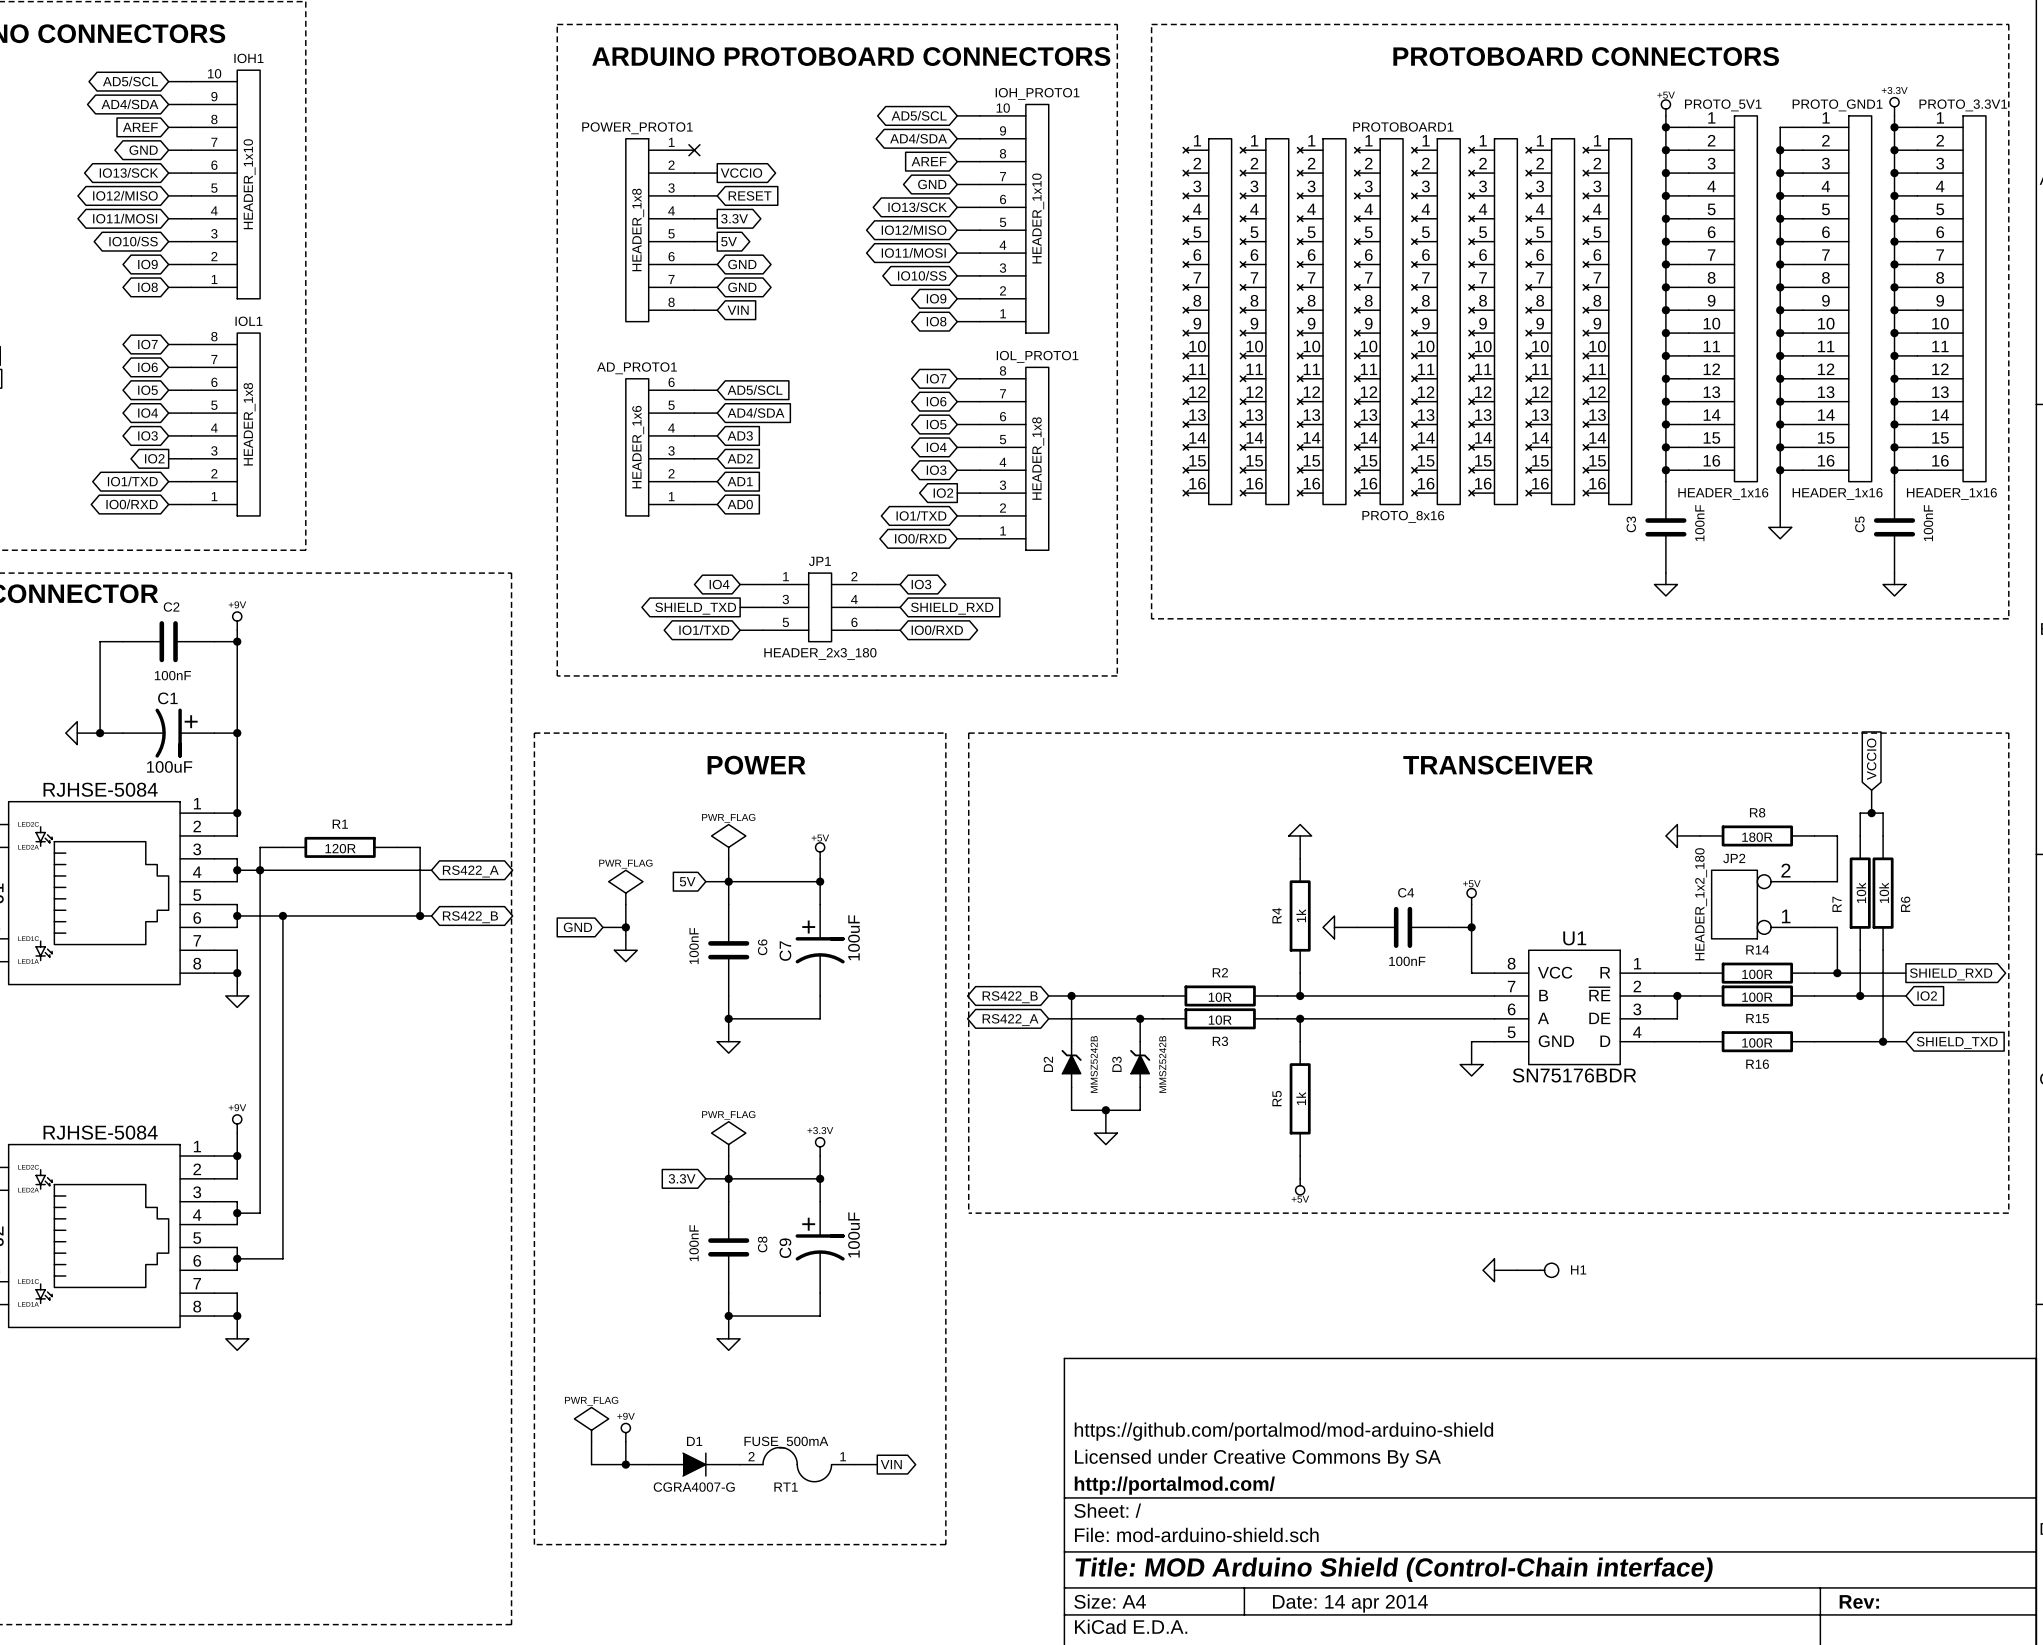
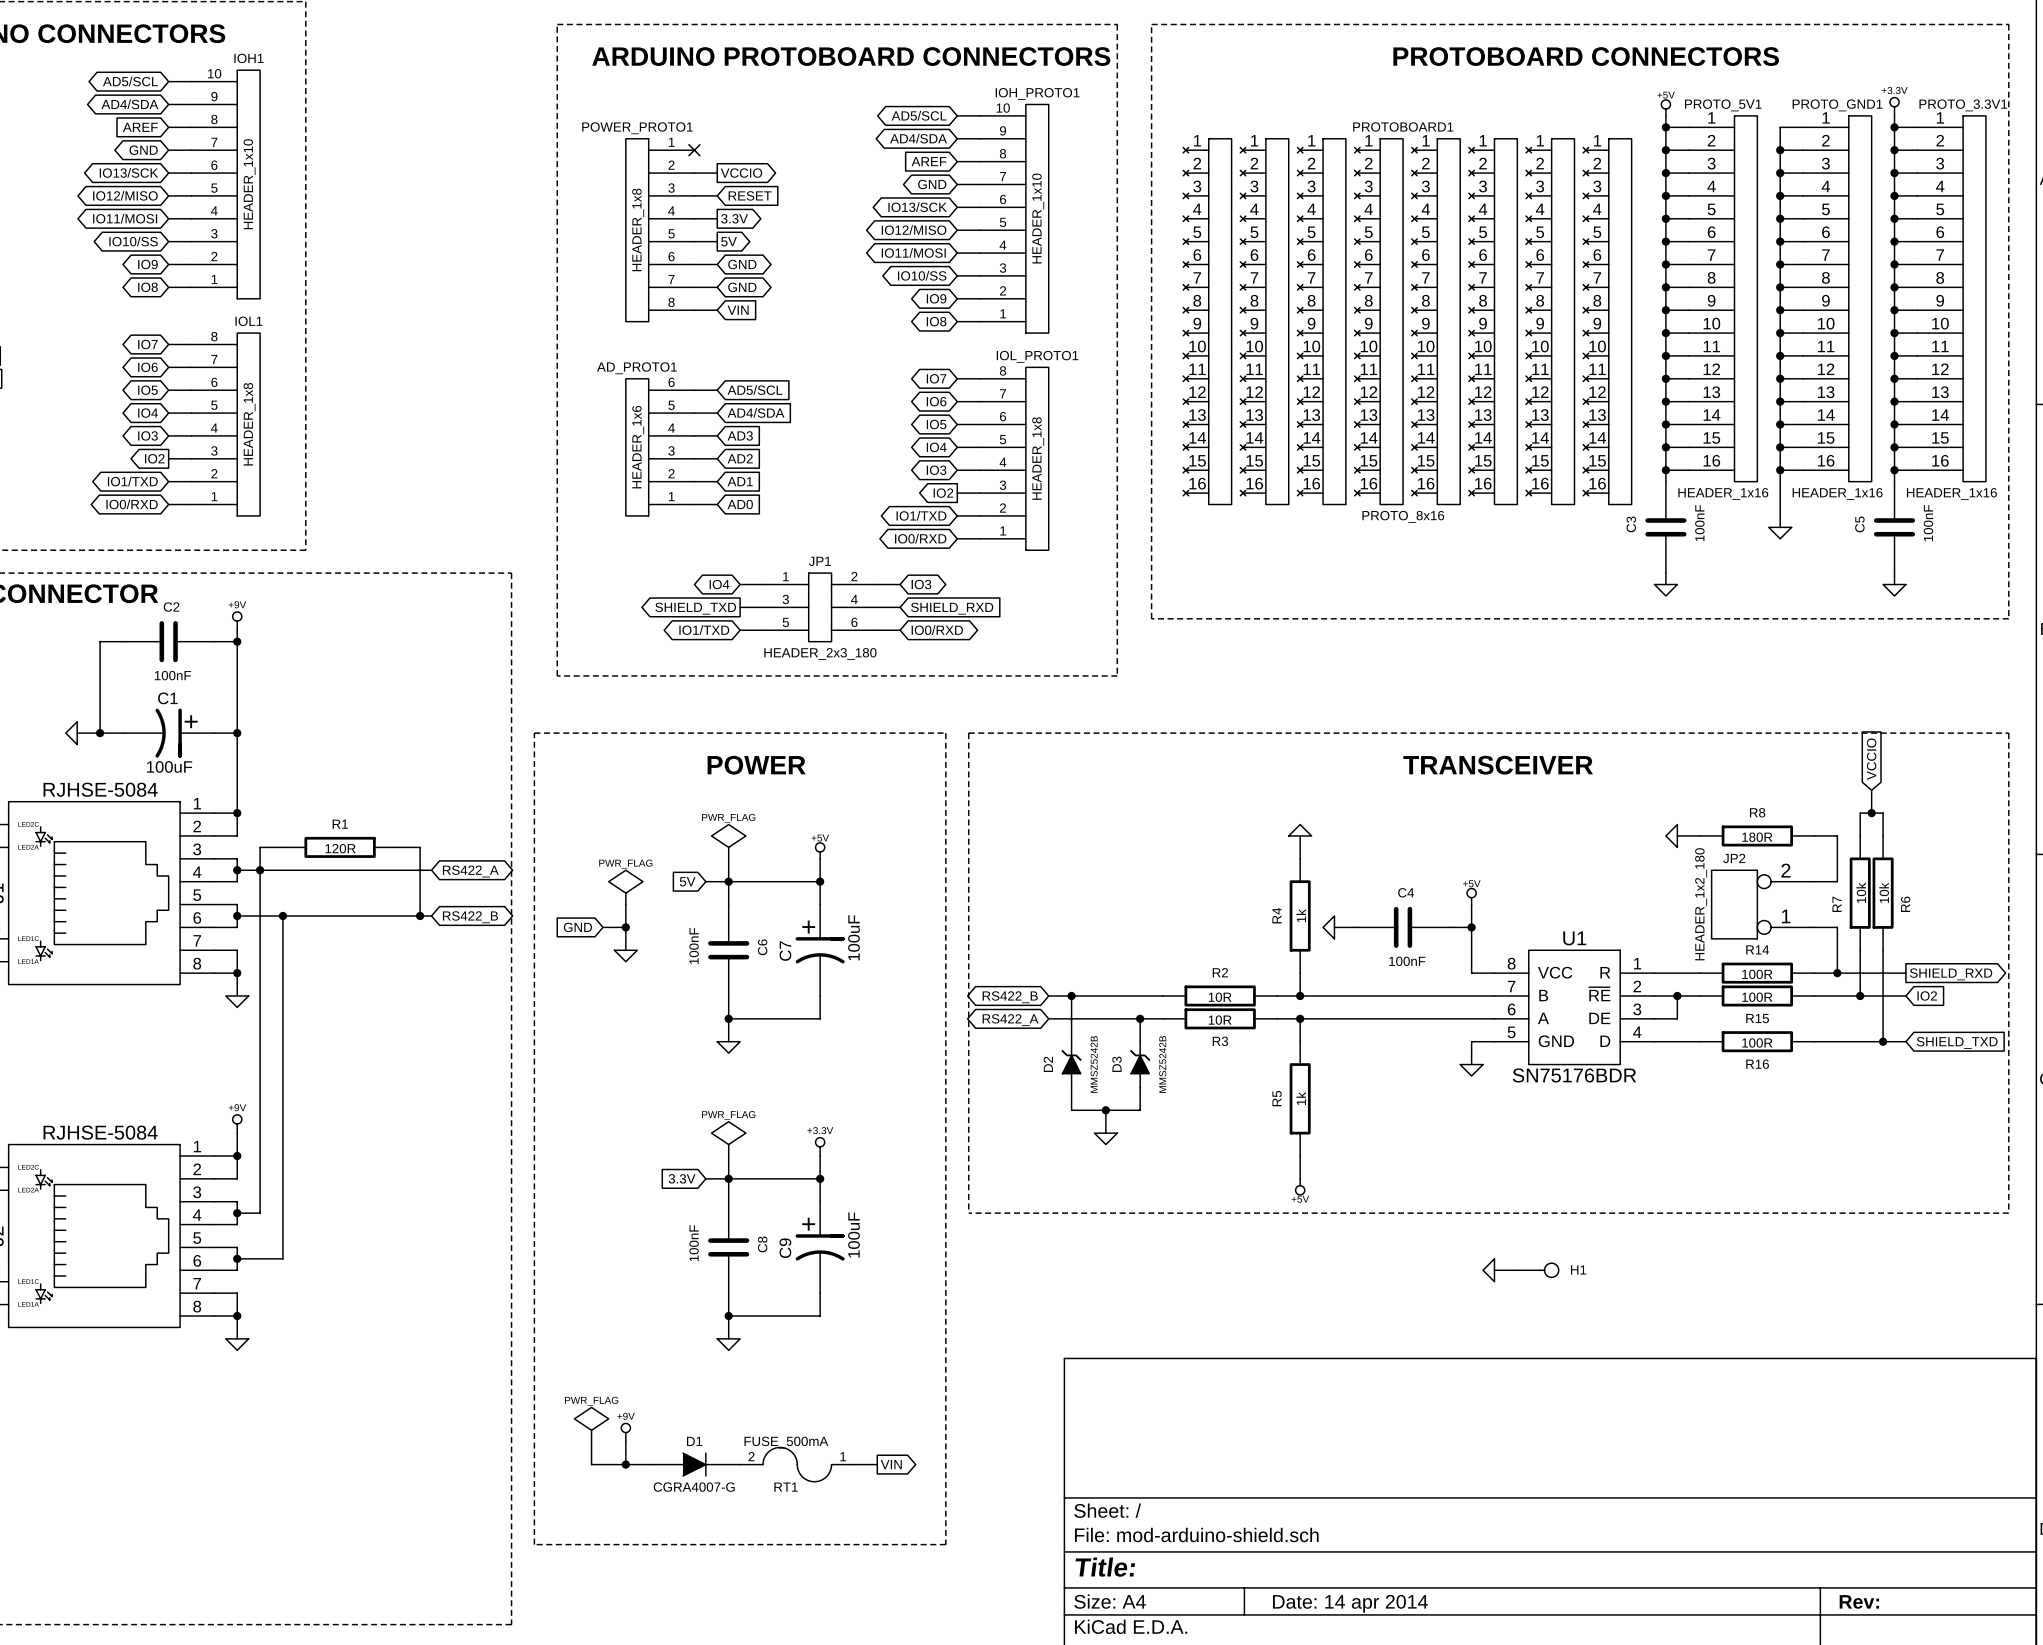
title block: https://github.com/portalmod/mod-arduino-shield (1283, 1431) -> none
title block: Licensed under Creative Commons By SA (1257, 1458) -> none
title block: http://portalmod.com/ (1174, 1485) -> none
title block: Title: MOD Arduino Shield (Control-Chain interface) (1394, 1569) -> Title: (1105, 1567)

